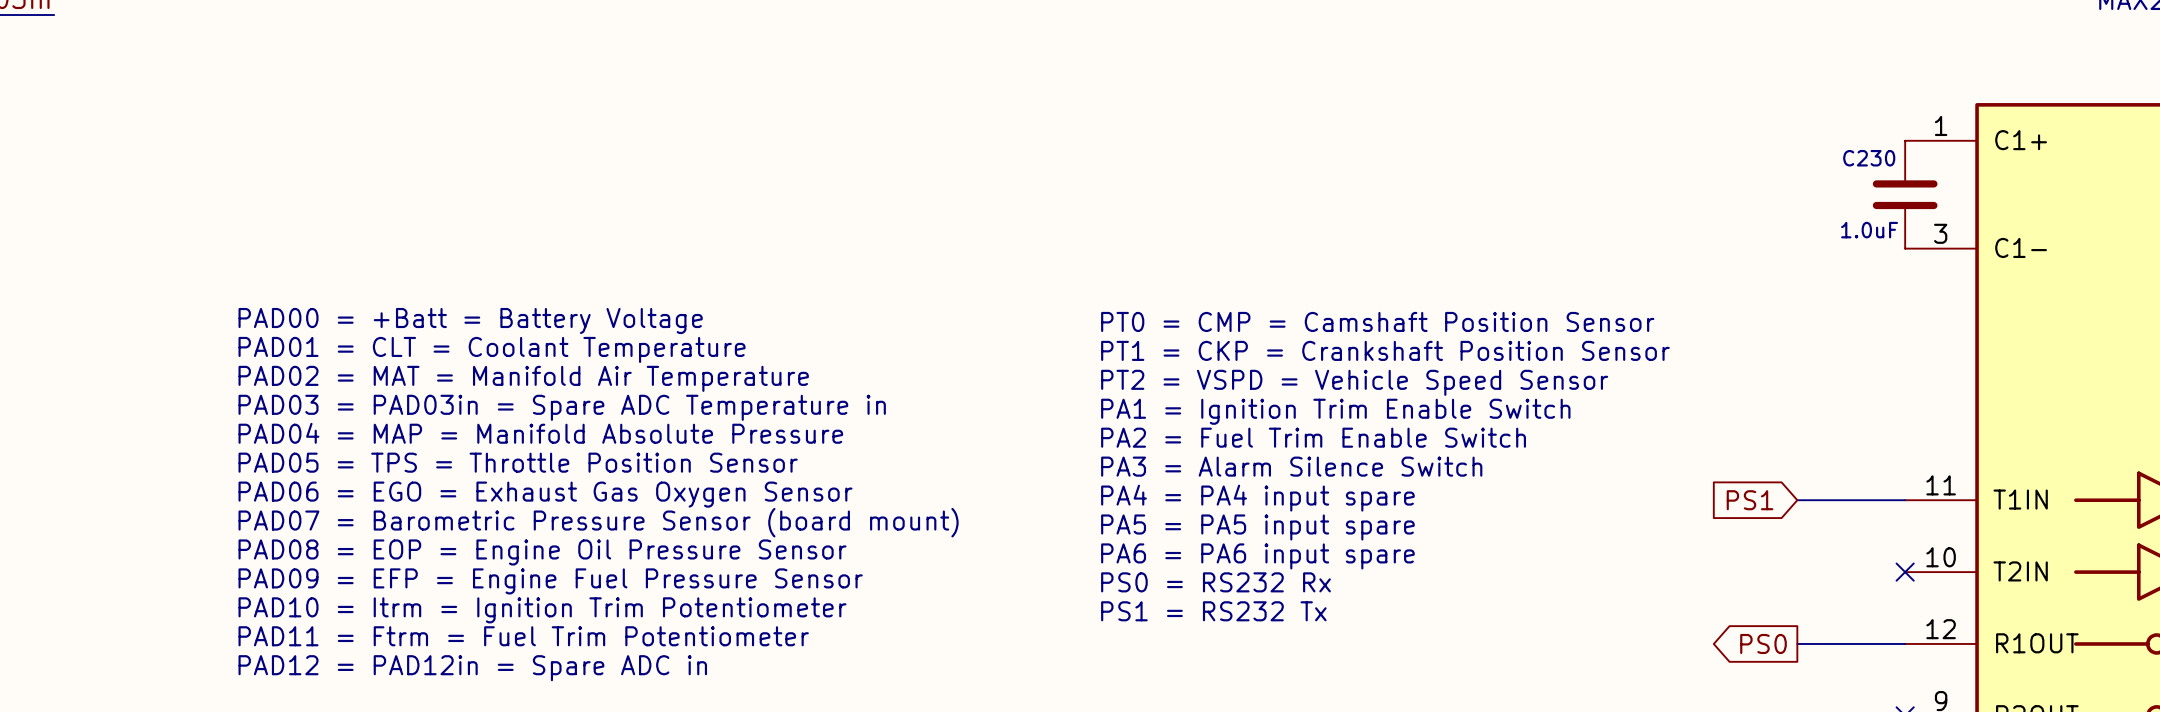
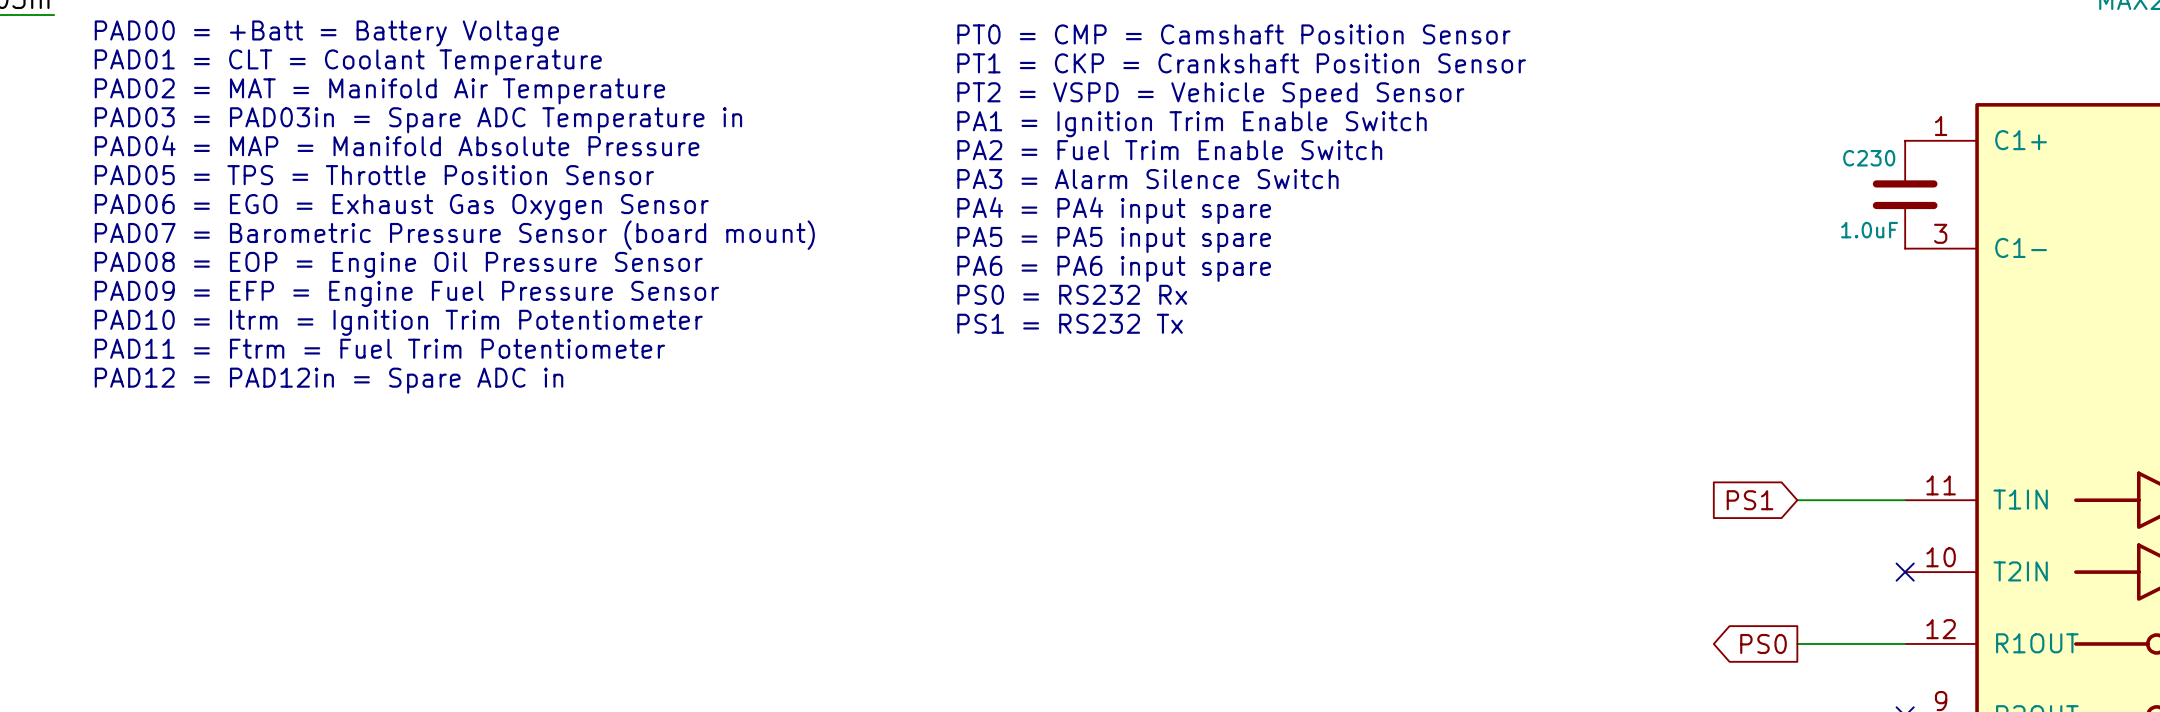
text position: PAD00 = +Batt = Battery Voltage (470, 321) -> PAD00 = +Batt = Battery Voltage (326, 33)
text position: PT0 = CMP = Camshaft Position Sensor (1377, 321) -> PT0 = CMP = Camshaft Position Sensor (1233, 34)
text position: PAD01 = CLT = Coolant Temperature (492, 349) -> PAD01 = CLT = Coolant Temperature (348, 62)
text position: PT1 = CKP = Crankshaft Position Sensor (1385, 350) -> PT1 = CKP = Crankshaft Position Sensor (1241, 63)
text position: PAD02 = MAT = Manifold Air Temperature (523, 378) -> PAD02 = MAT = Manifold Air Temperature (379, 91)
text position: PT2 = VSPD = Vehicle Speed Sensor (1354, 382) -> PT2 = VSPD = Vehicle Speed Sensor (1210, 95)
text position: PAD03 = PAD03in = Spare ADC Temperature in (562, 407) -> PAD03 = PAD03in = Spare ADC Temperature in (418, 120)
text position: PA1 = Ignition Trim Enable Switch (1335, 411) -> PA1 = Ignition Trim Enable Switch (1192, 124)
text position: PAD04 = MAP = Manifold Absolute Pressure (540, 433) -> PAD04 = MAP = Manifold Absolute Pressure (397, 145)
text position: PA2 = Fuel Trim Enable Switch (1313, 437) -> PA2 = Fuel Trim Enable Switch (1169, 150)
text position: PAD05 = TPS = Throttle Position Sensor (518, 462) -> PAD05 = TPS = Throttle Position Sensor (374, 175)
text position: PA3 = Alarm Silence Switch (1291, 466) -> PA3 = Alarm Silence Switch (1147, 179)
text position: PAD06 = EGO = Exhaust Gas Oxygen Sensor (545, 494) -> PAD06 = EGO = Exhaust Gas Oxygen Sensor (401, 207)
text position: PA4 = PA4 input spare (1257, 498) -> PA4 = PA4 input spare (1114, 210)
text position: PAD07 = Barometric Pressure Sensor (board mount) (598, 522) -> PAD07 = Barometric Pressure Sensor (board mount) (454, 235)
text position: PA5 = PA5 input spare (1257, 527) -> PA5 = PA5 input spare (1114, 239)
text position: PAD08 = EOP = Engine Oil Pressure Sensor (542, 552) -> PAD08 = EOP = Engine Oil Pressure Sensor (398, 264)
text position: PA6 = PA6 input spare (1257, 556) -> PA6 = PA6 input spare (1114, 268)
text position: PAD09 = EFP = Engine Fuel Pressure Sensor (550, 581) -> PAD09 = EFP = Engine Fuel Pressure Sensor (406, 293)
text position: PS0 = RS232 Rx (1215, 582) -> PS0 = RS232 Rx (1072, 294)
text position: PAD10 = Itrm = Ignition Trim Potentiometer (542, 610) -> PAD10 = Itrm = Ignition Trim Potentiometer (398, 322)
text position: PS1 = RS232 Tx (1213, 611) -> PS1 = RS232 Tx (1070, 323)
text position: PAD11 = Ftrm = Fuel Trim Potentiometer (523, 636) -> PAD11 = Ftrm = Fuel Trim Potentiometer (379, 348)
text position: PAD12 = PAD12in = Spare ADC in (472, 668) -> PAD12 = PAD12in = Spare ADC in (329, 380)

